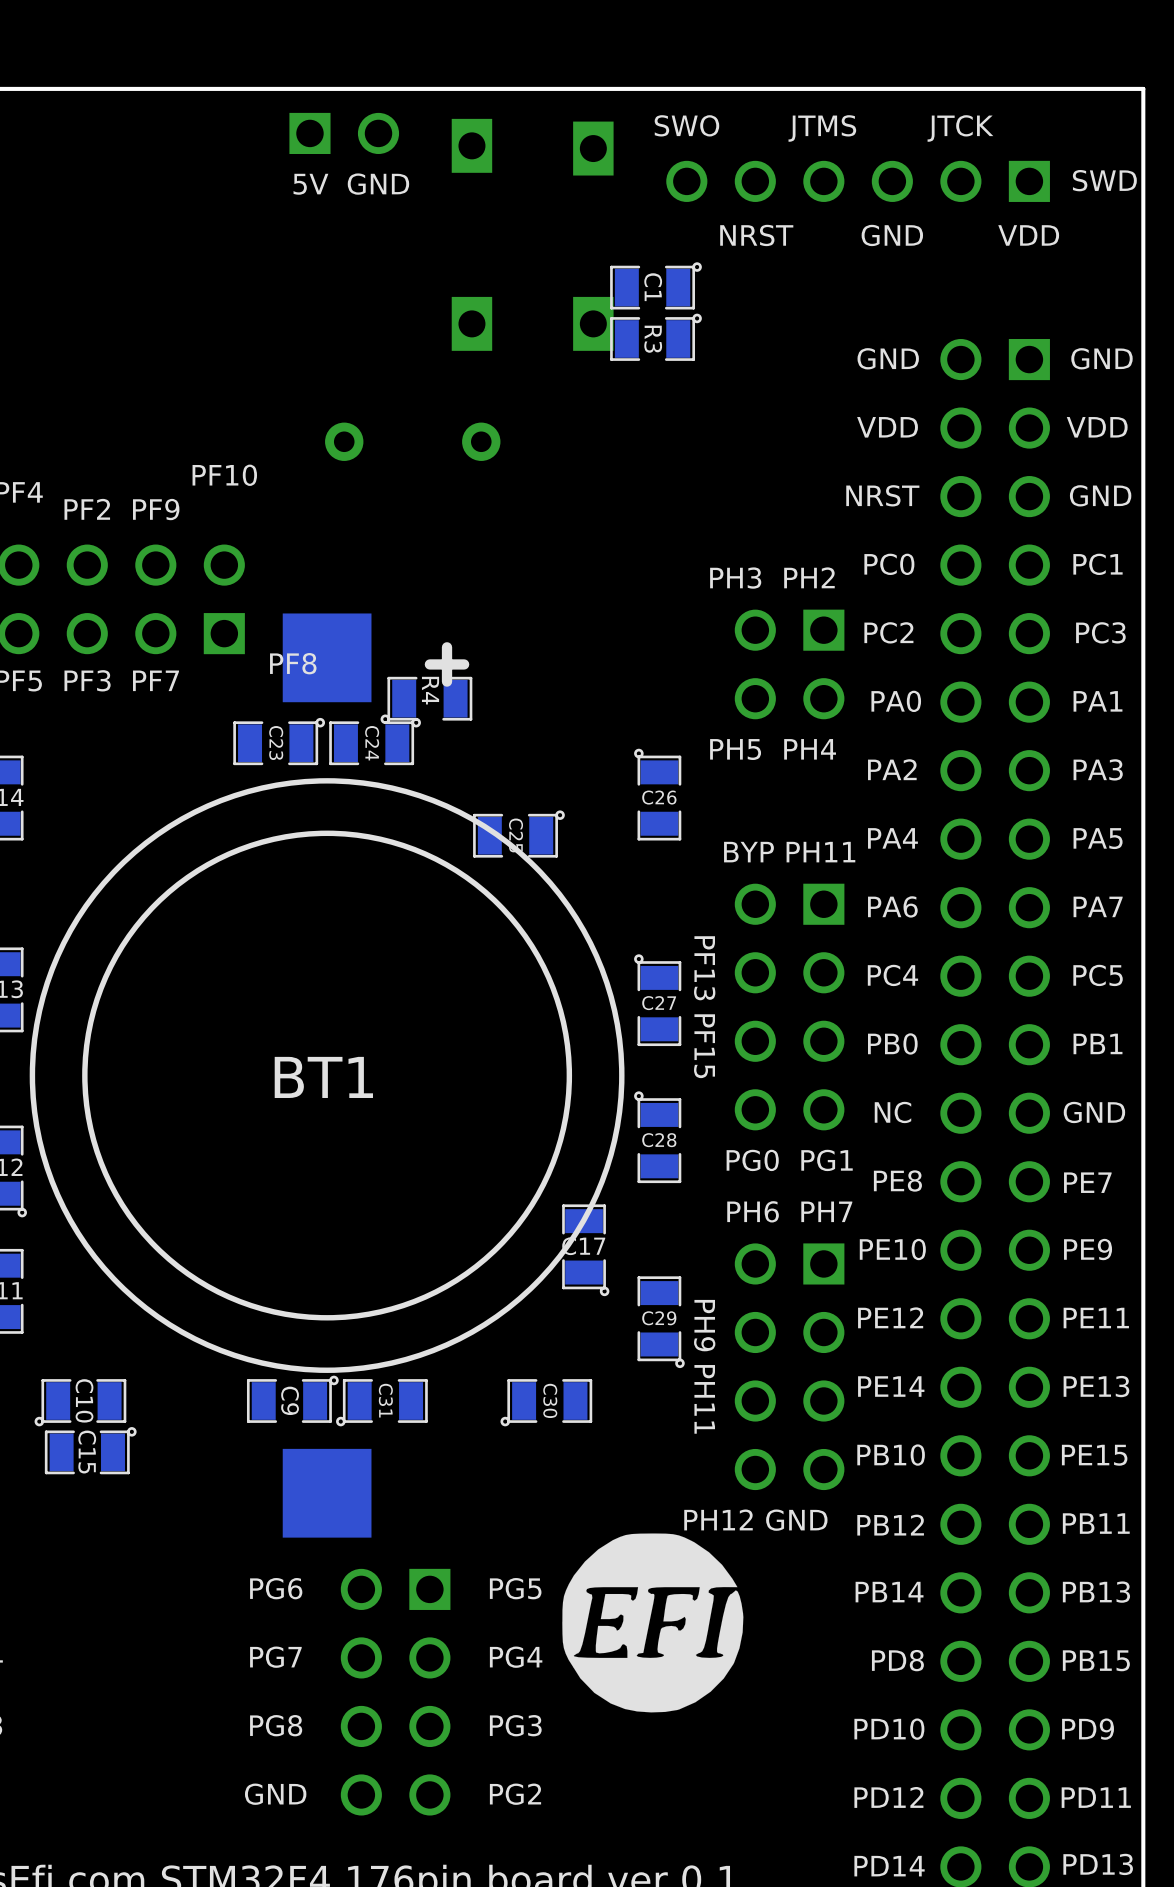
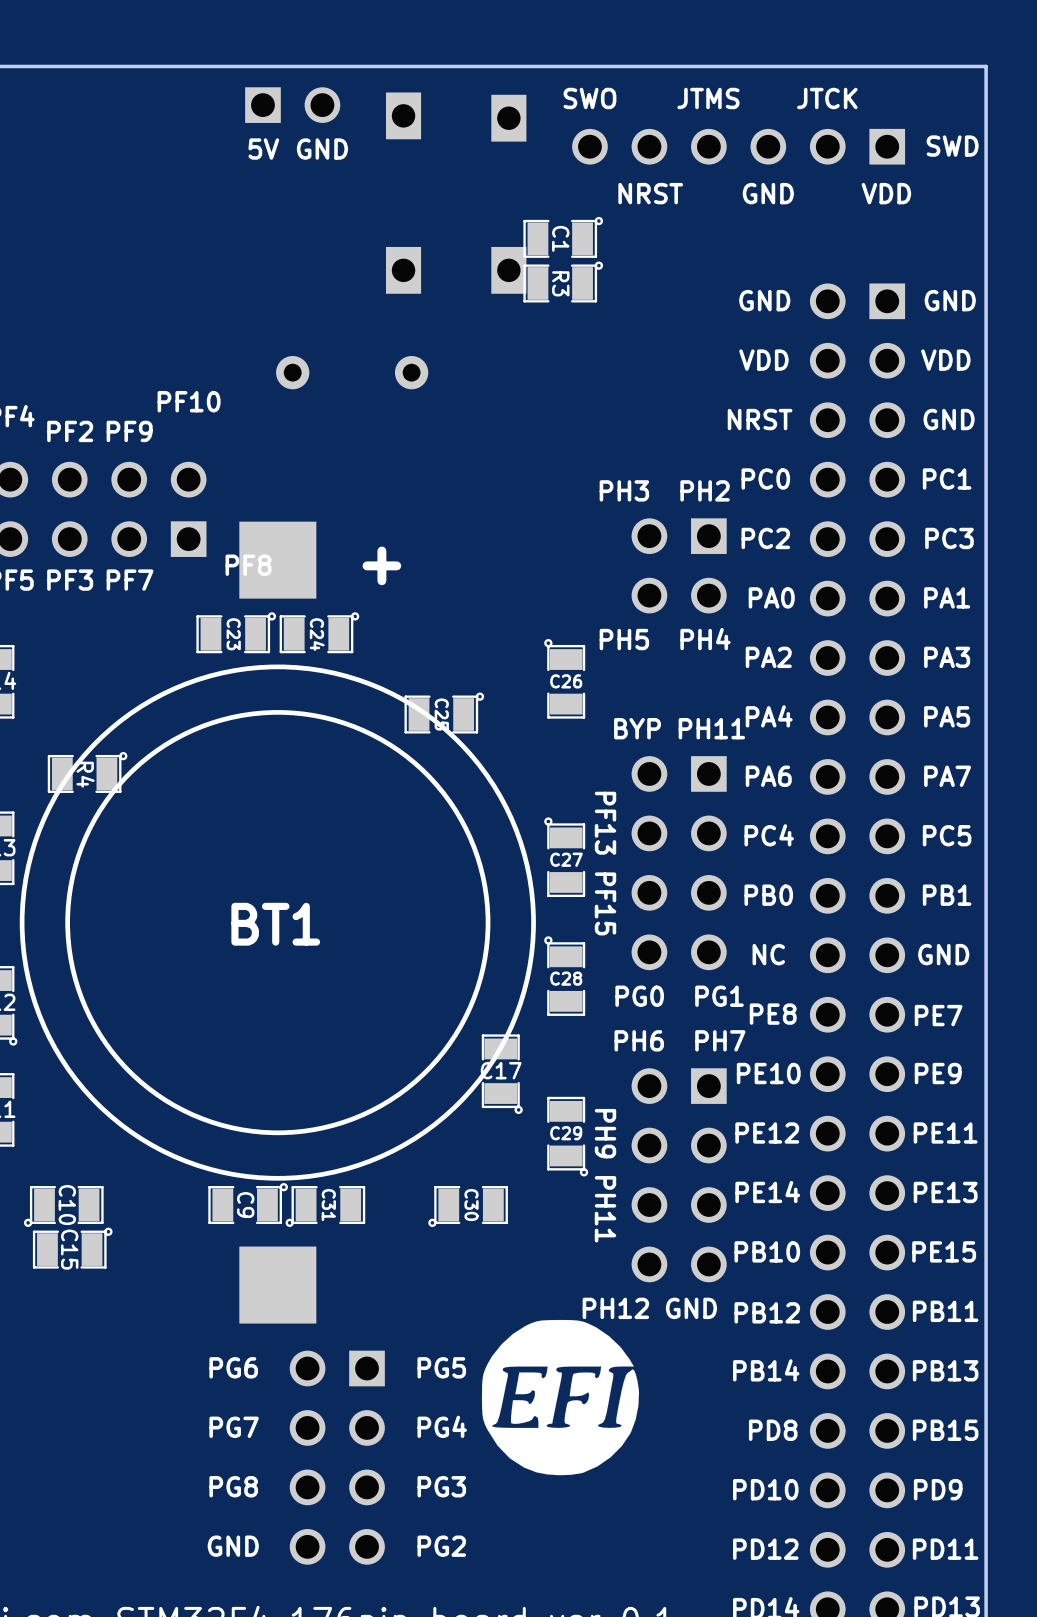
R4 rotation: 0° (426, 700) -> 180° (87, 772)
R4 position: (426, 700) -> (87, 772)

